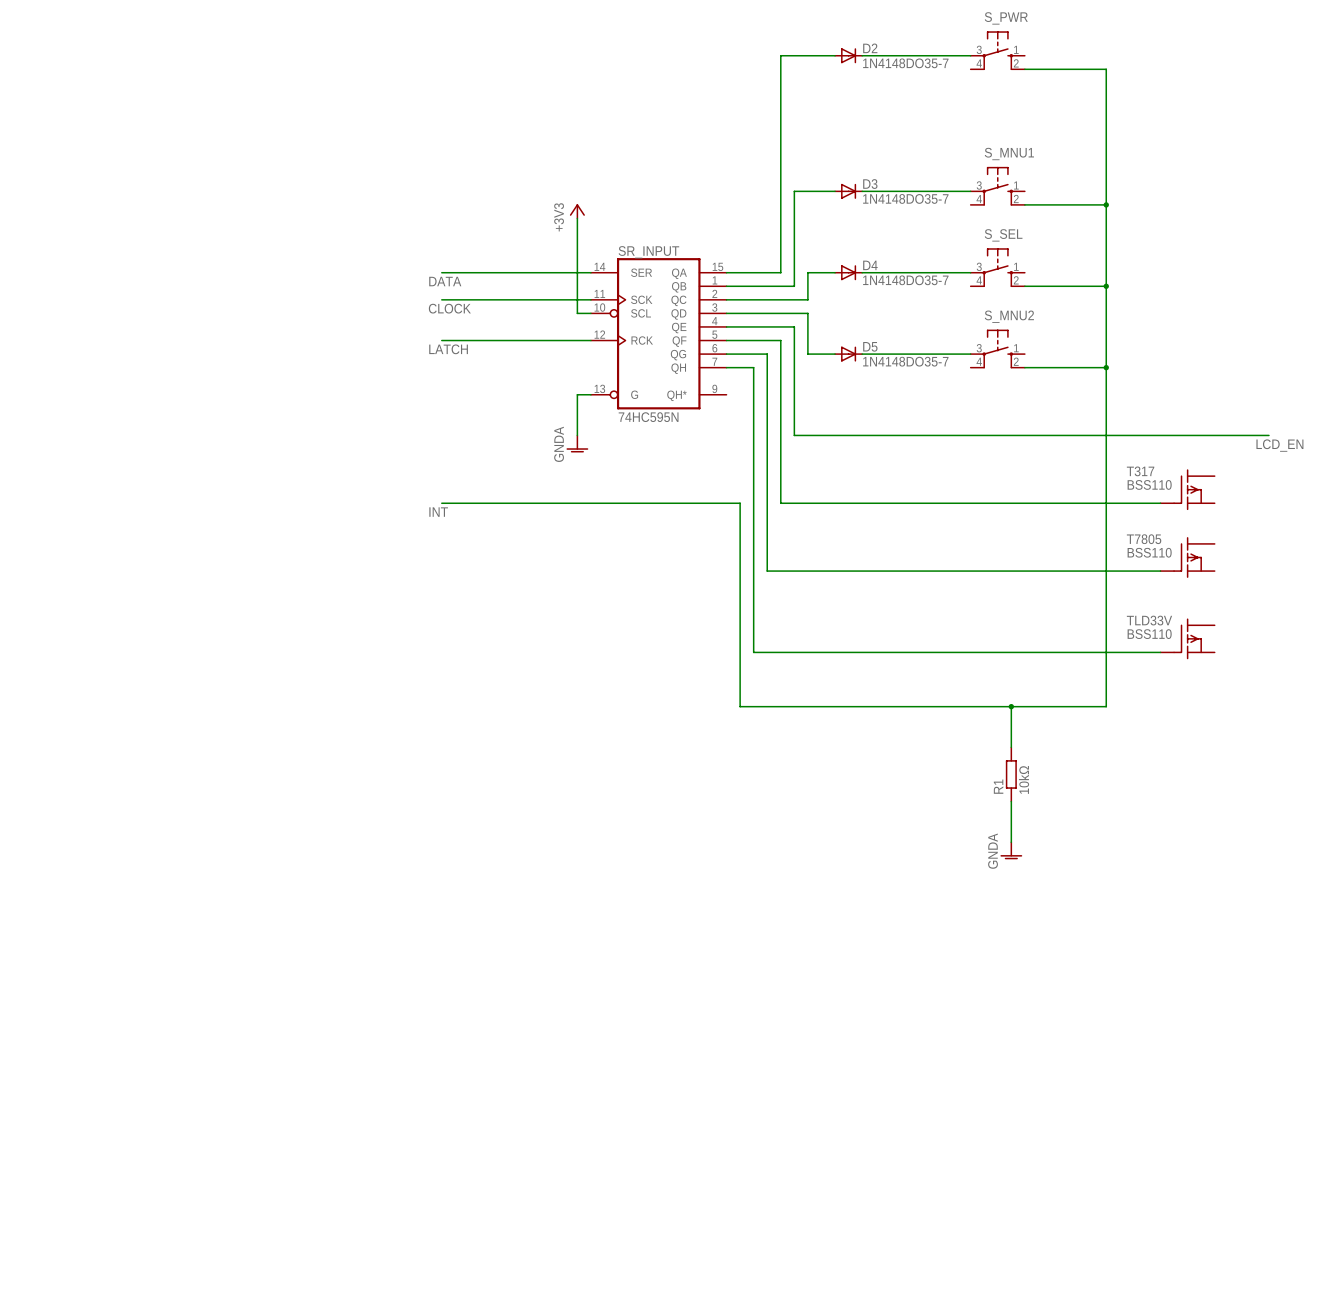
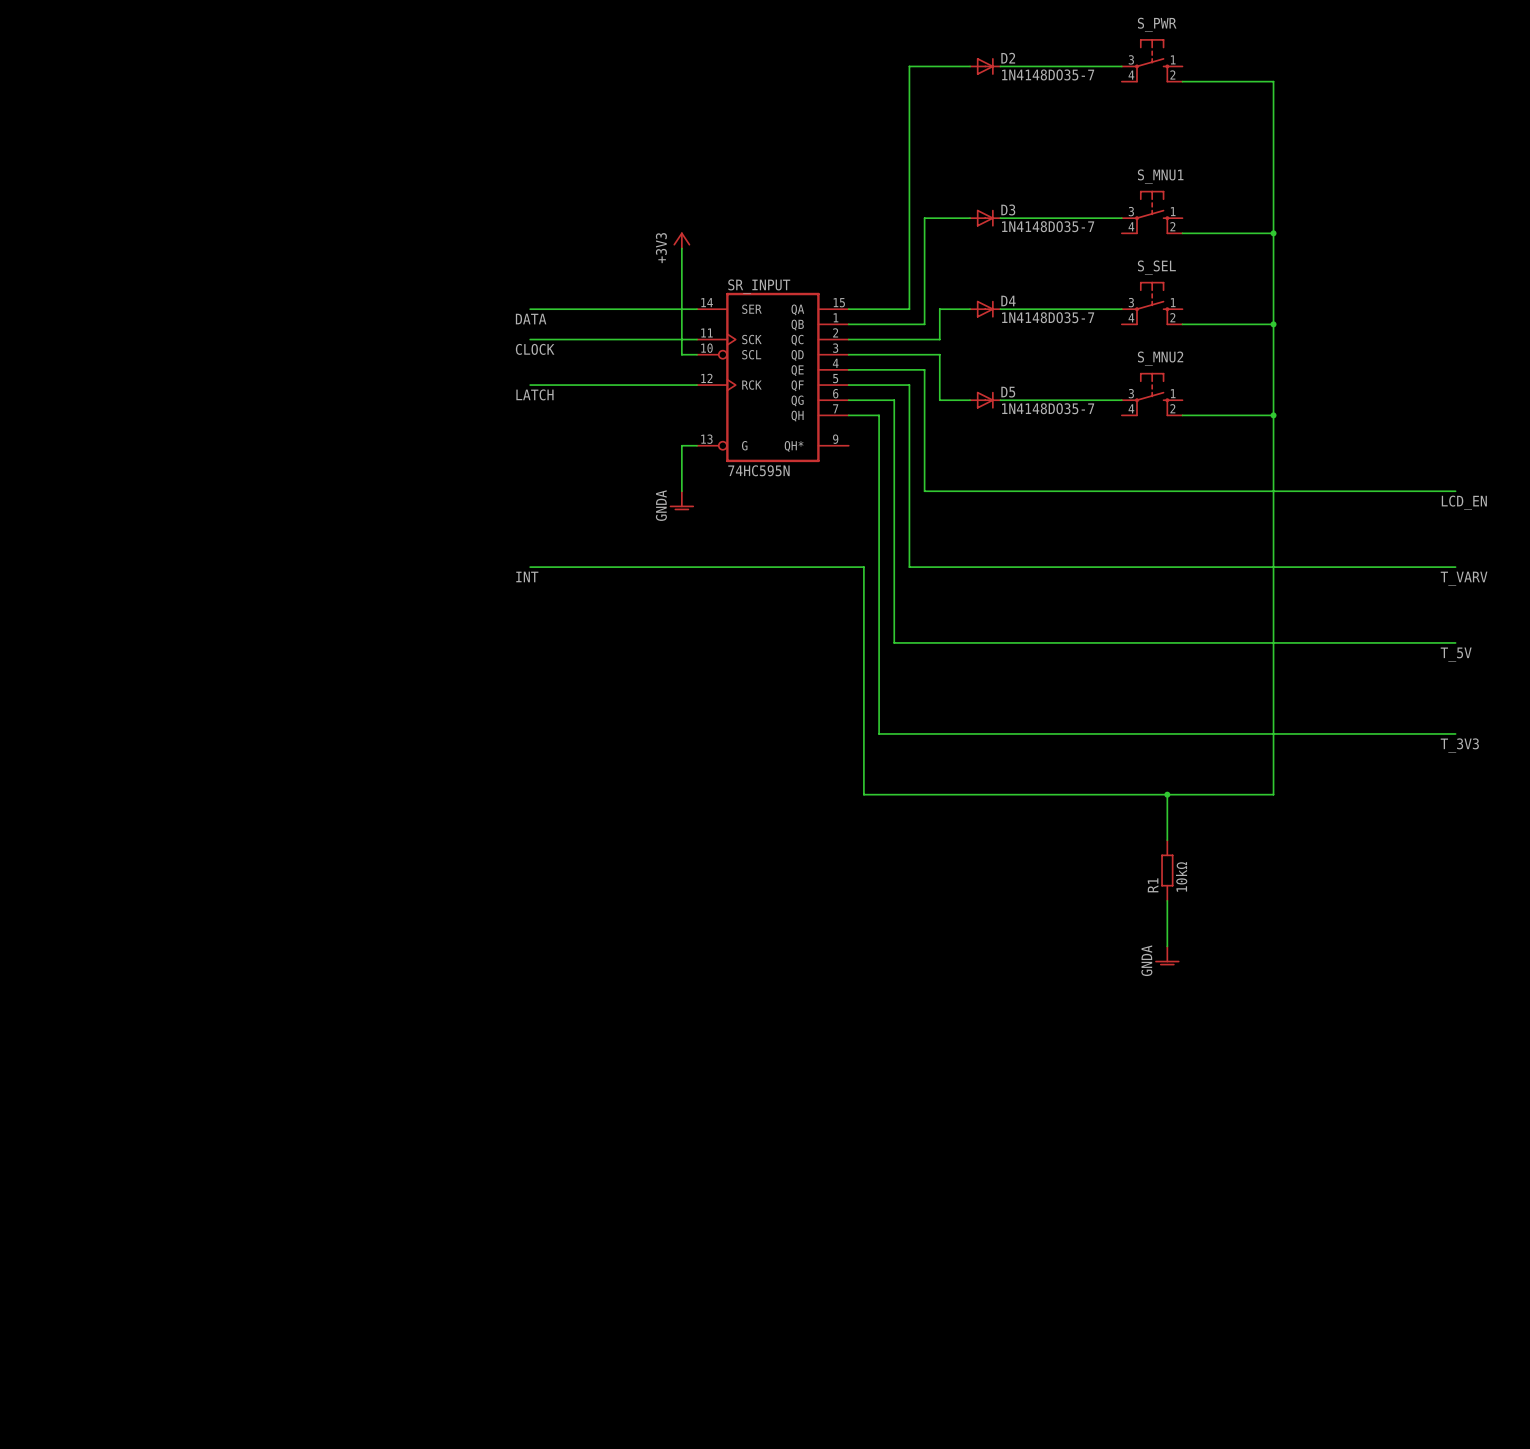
T317: BSS110 (1187, 489) -> none
wire: none -> (1334, 567) (1455, 567)
label: none -> T_VARV (1464, 578)
T7805: BSS110 (1187, 557) -> none
wire: none -> (1334, 642) (1455, 642)
label: none -> T_5V (1456, 654)
TLD33V: BSS110 (1187, 638) -> none
wire: none -> (1334, 733) (1455, 733)
label: none -> T_3V3 (1459, 745)

